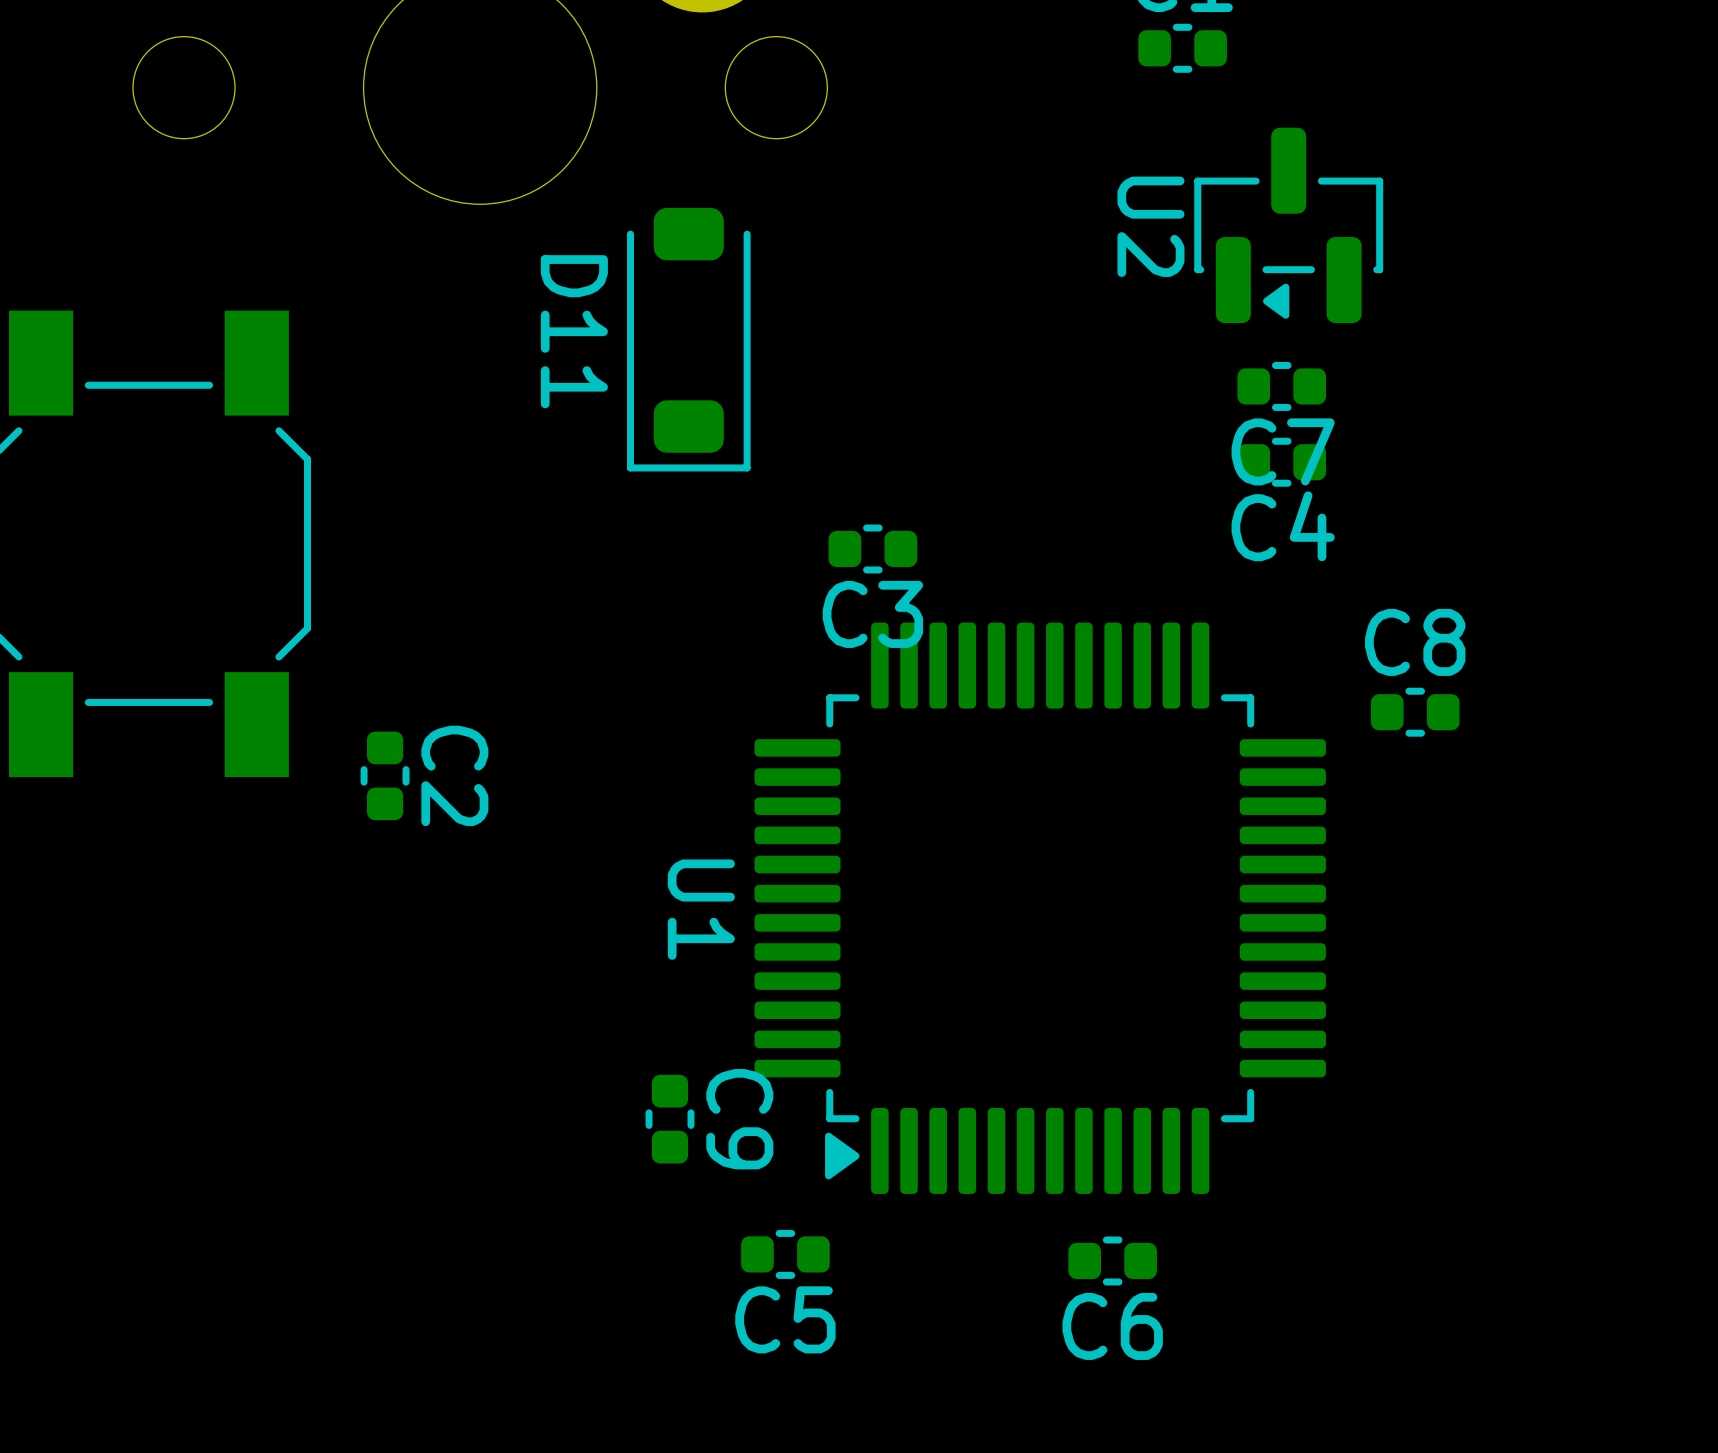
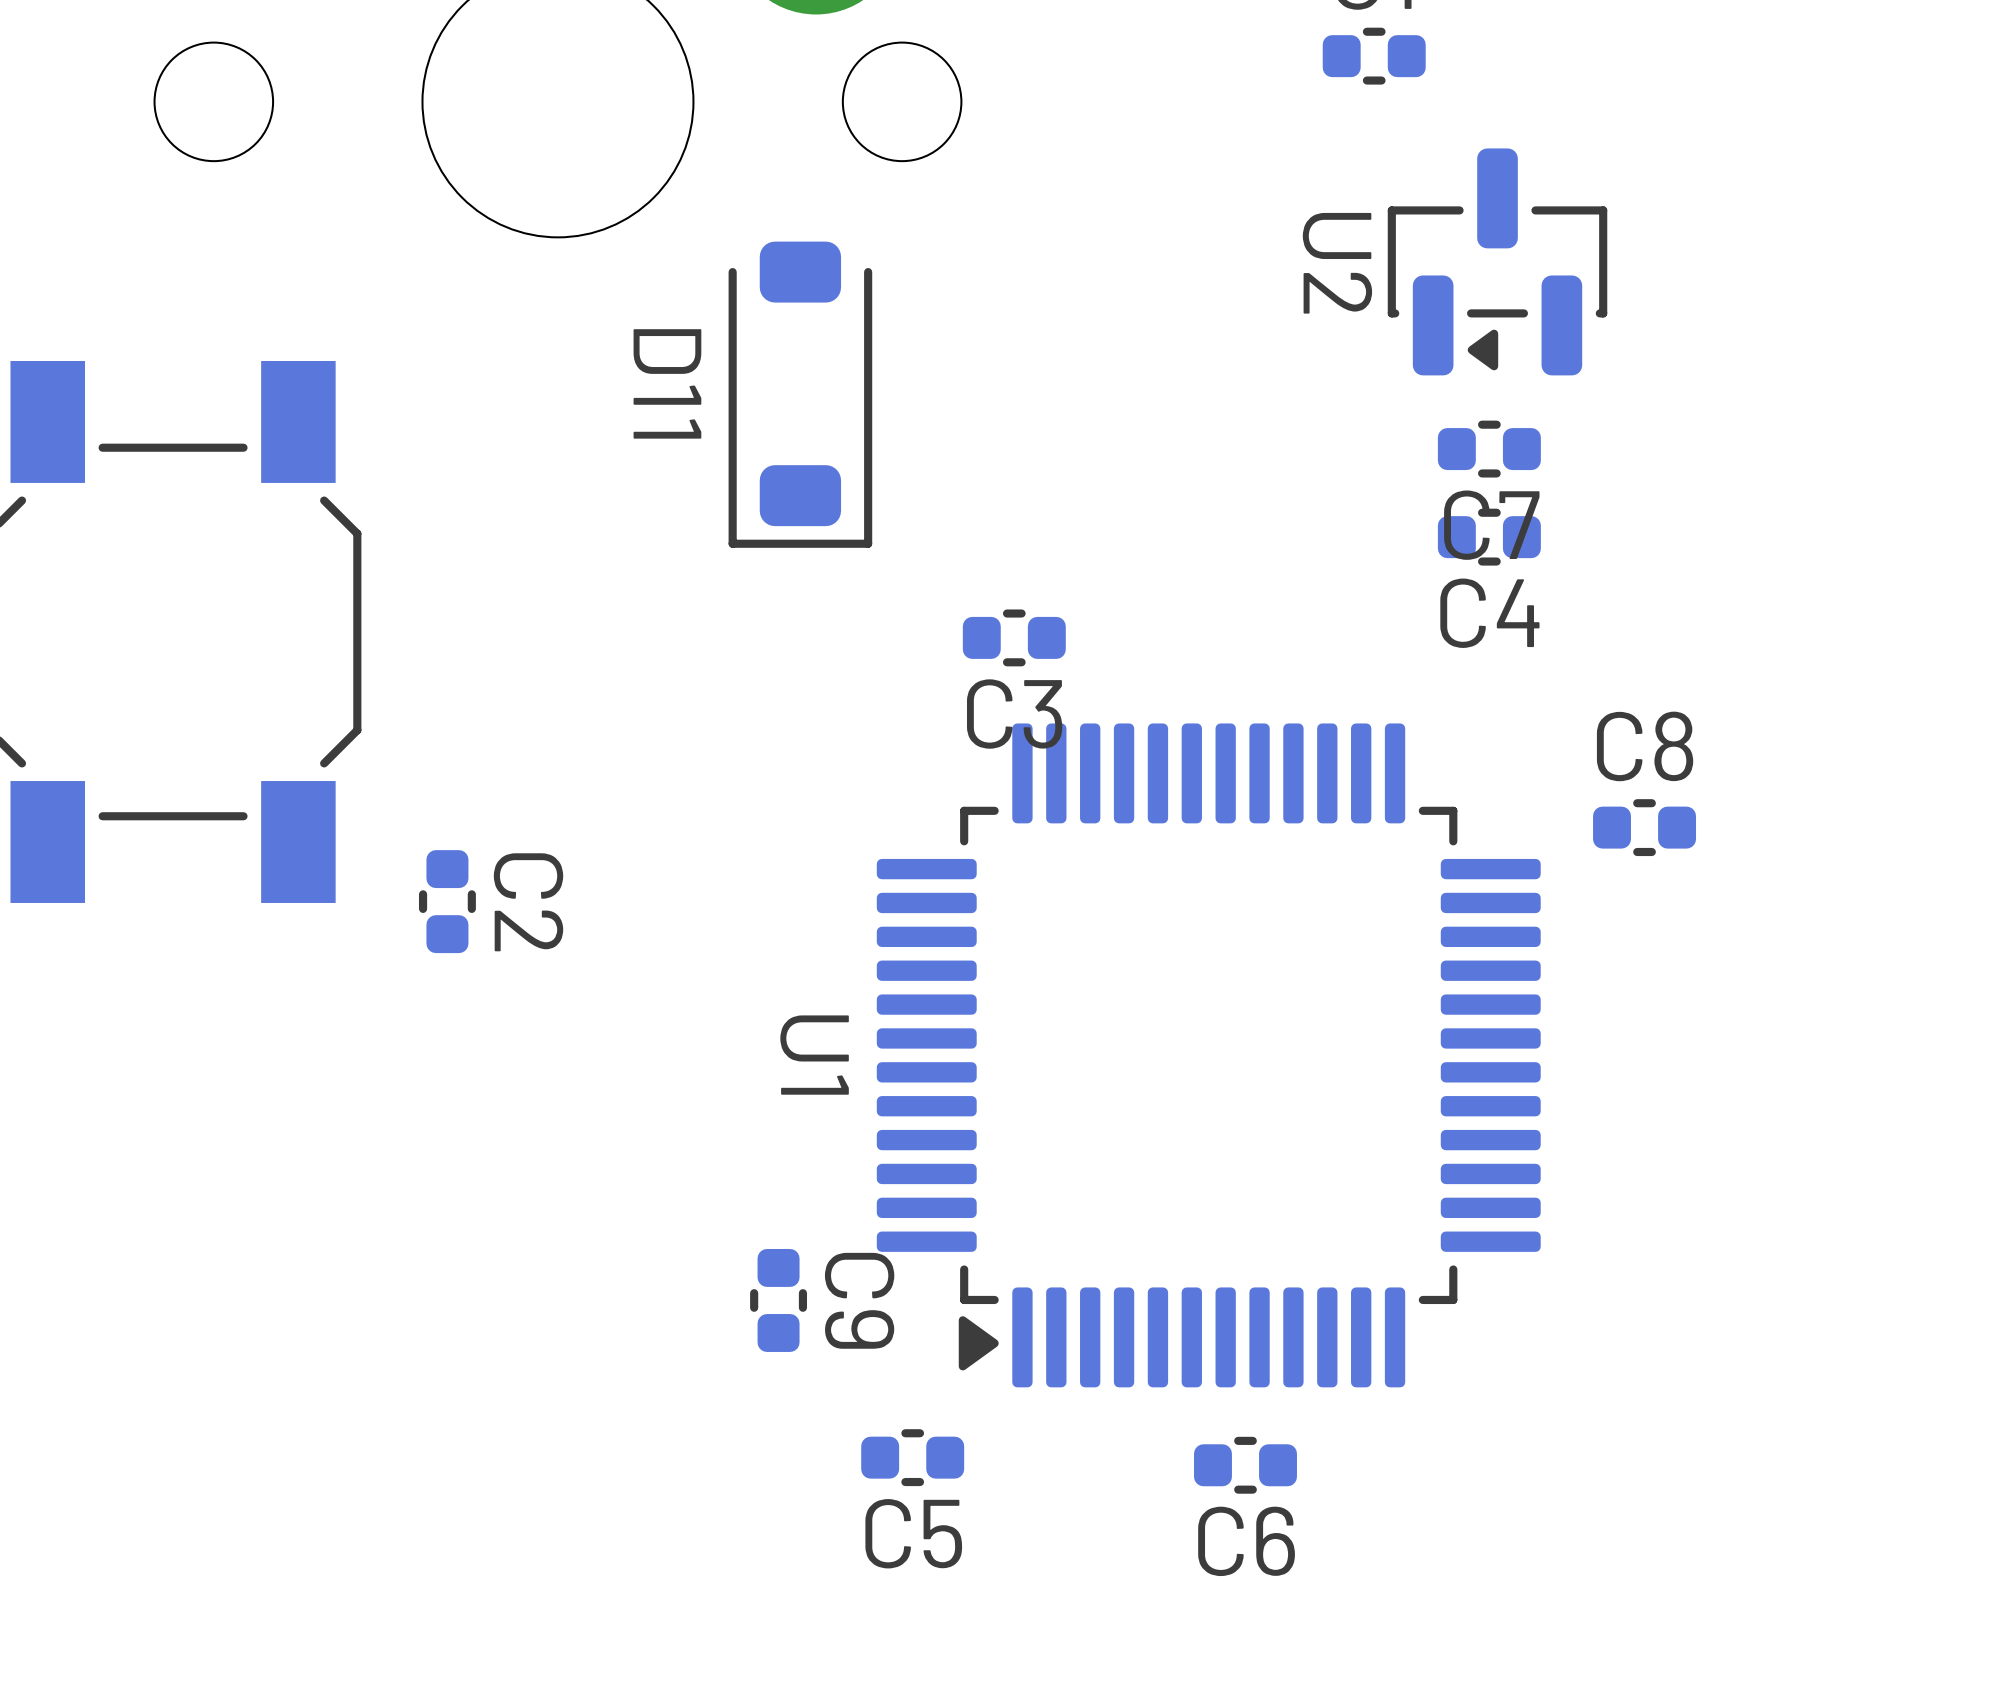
C6 position: (1112, 1260) -> (1245, 1465)

